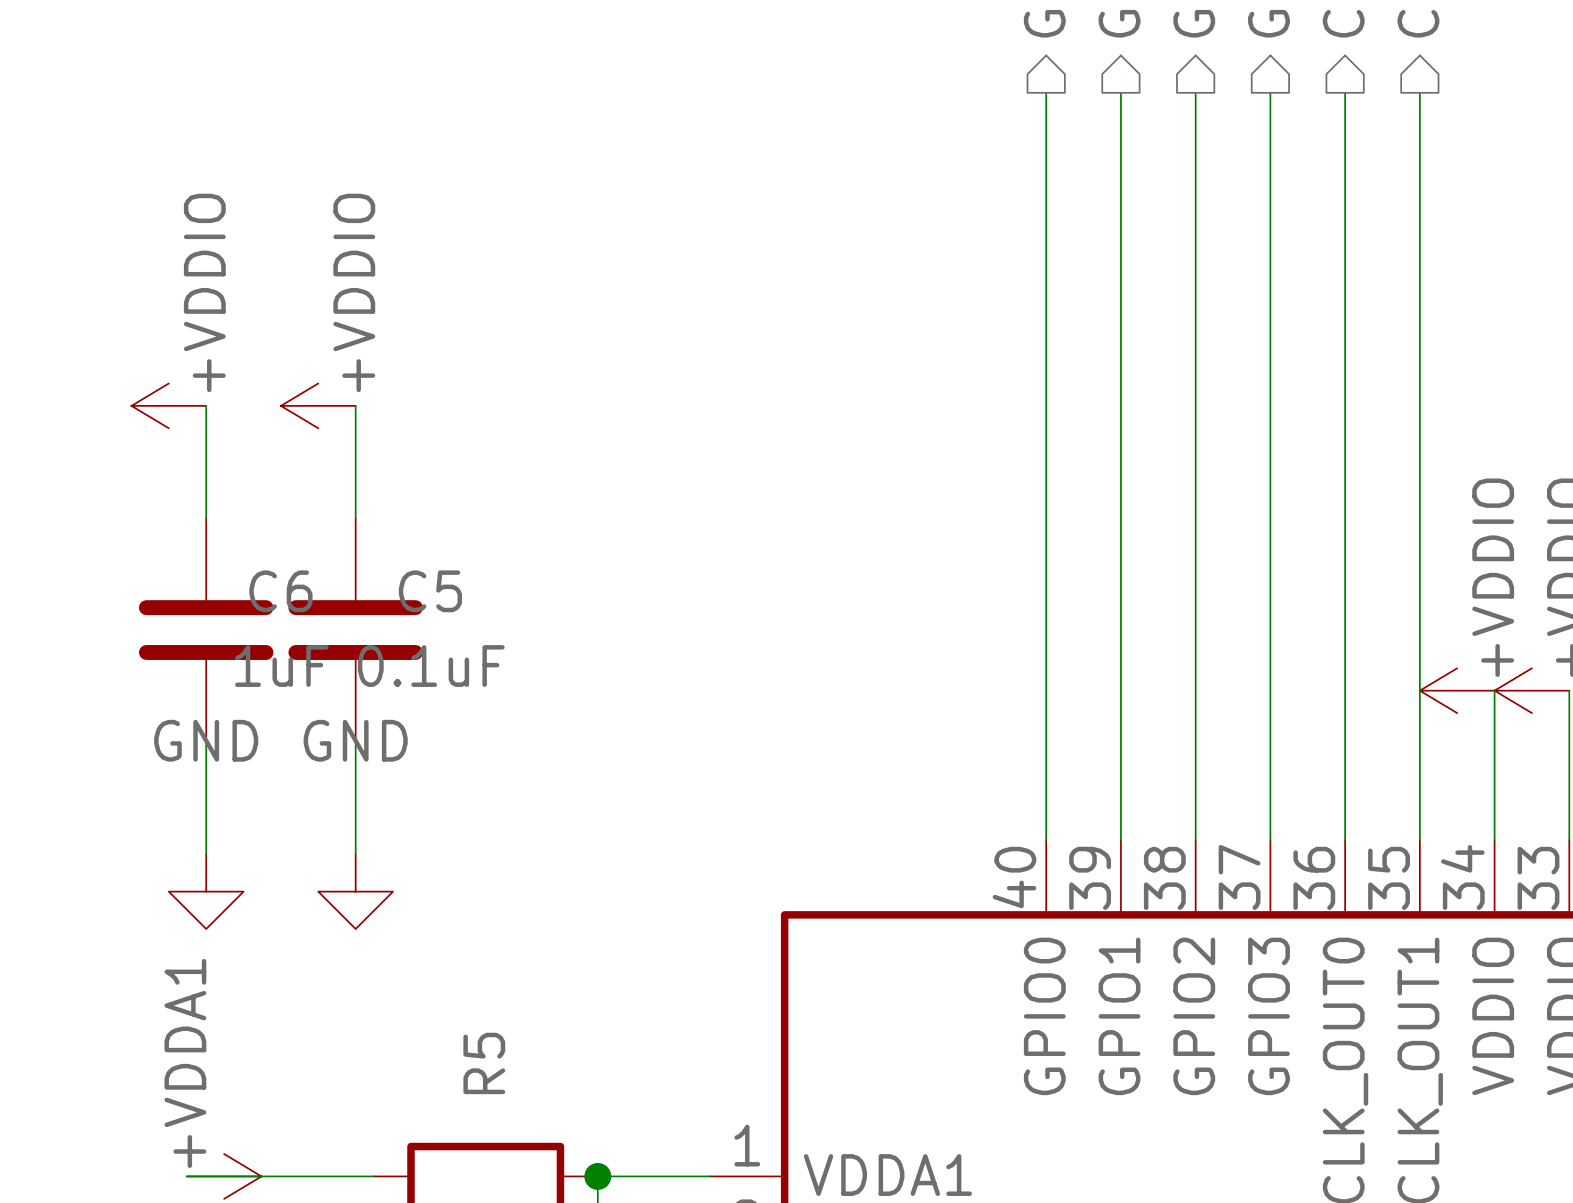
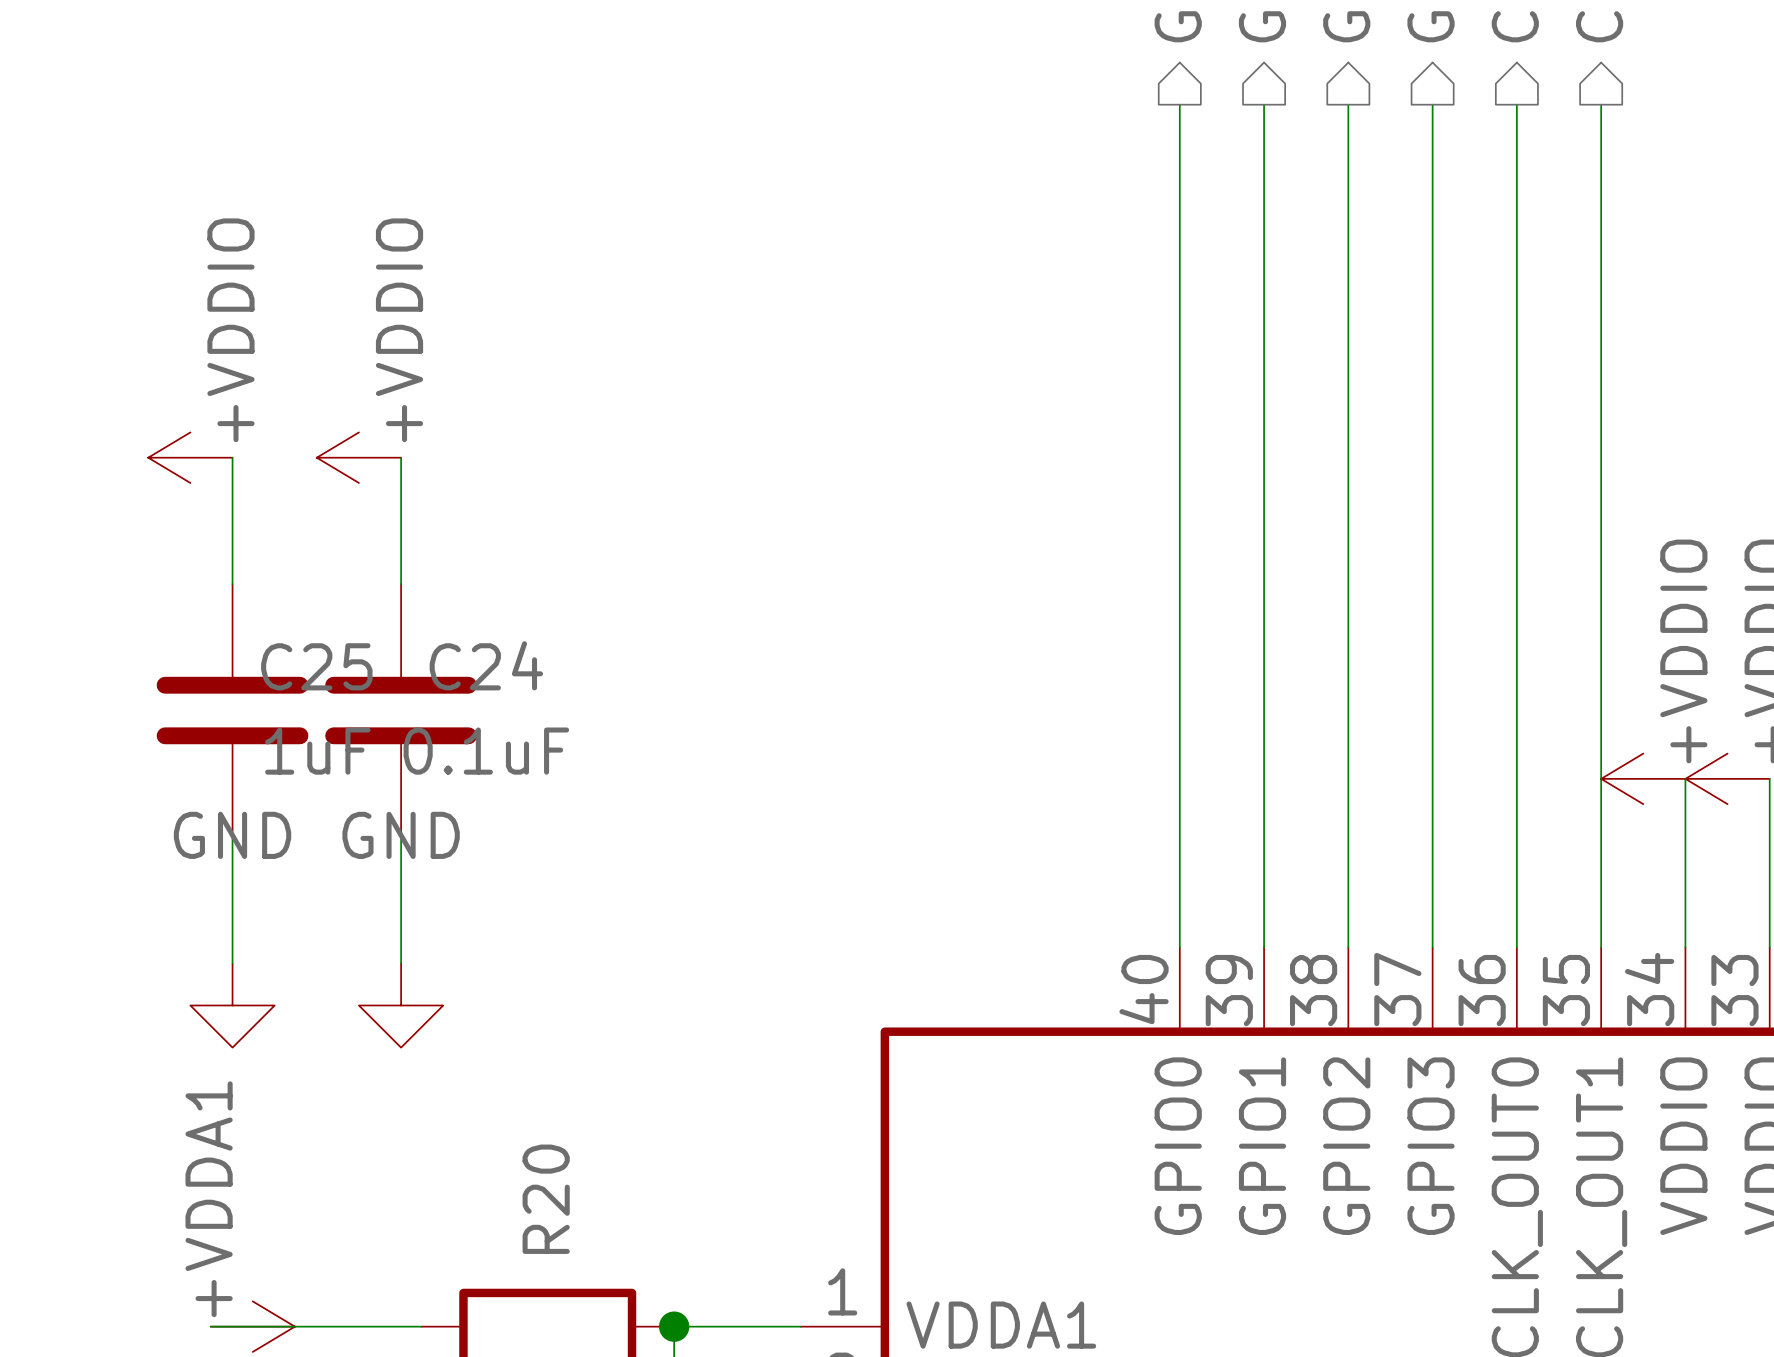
C6 name: C6 (280, 591) -> C25 (316, 666)
C5 name: C5 (430, 591) -> C24 (486, 665)
R5 name: R5 (484, 1063) -> R20 (546, 1199)

